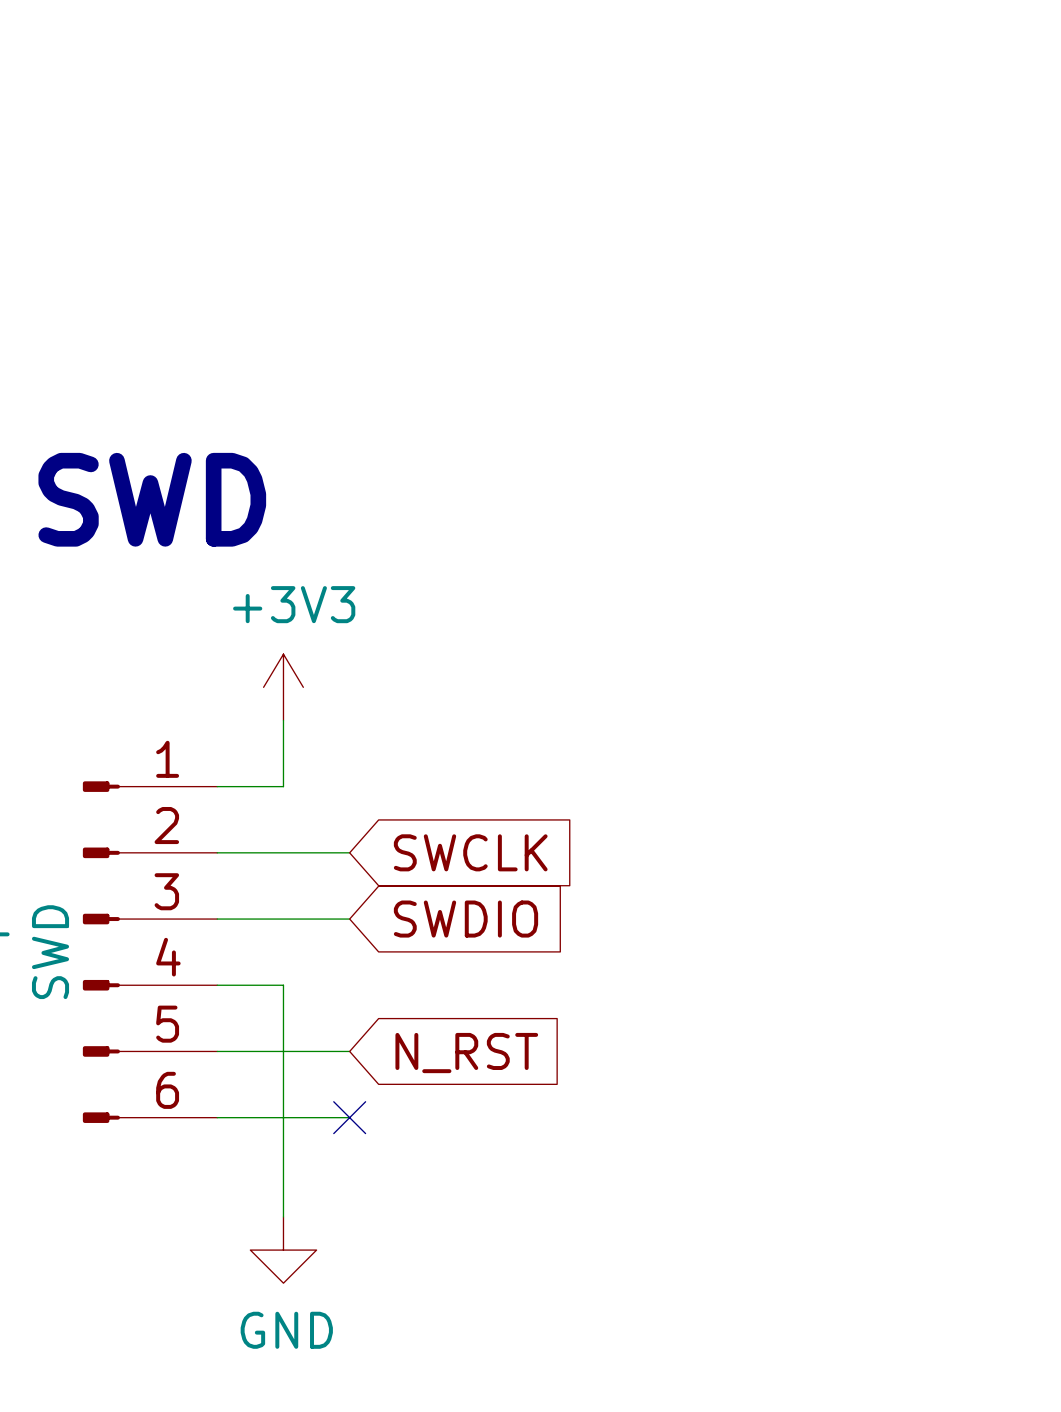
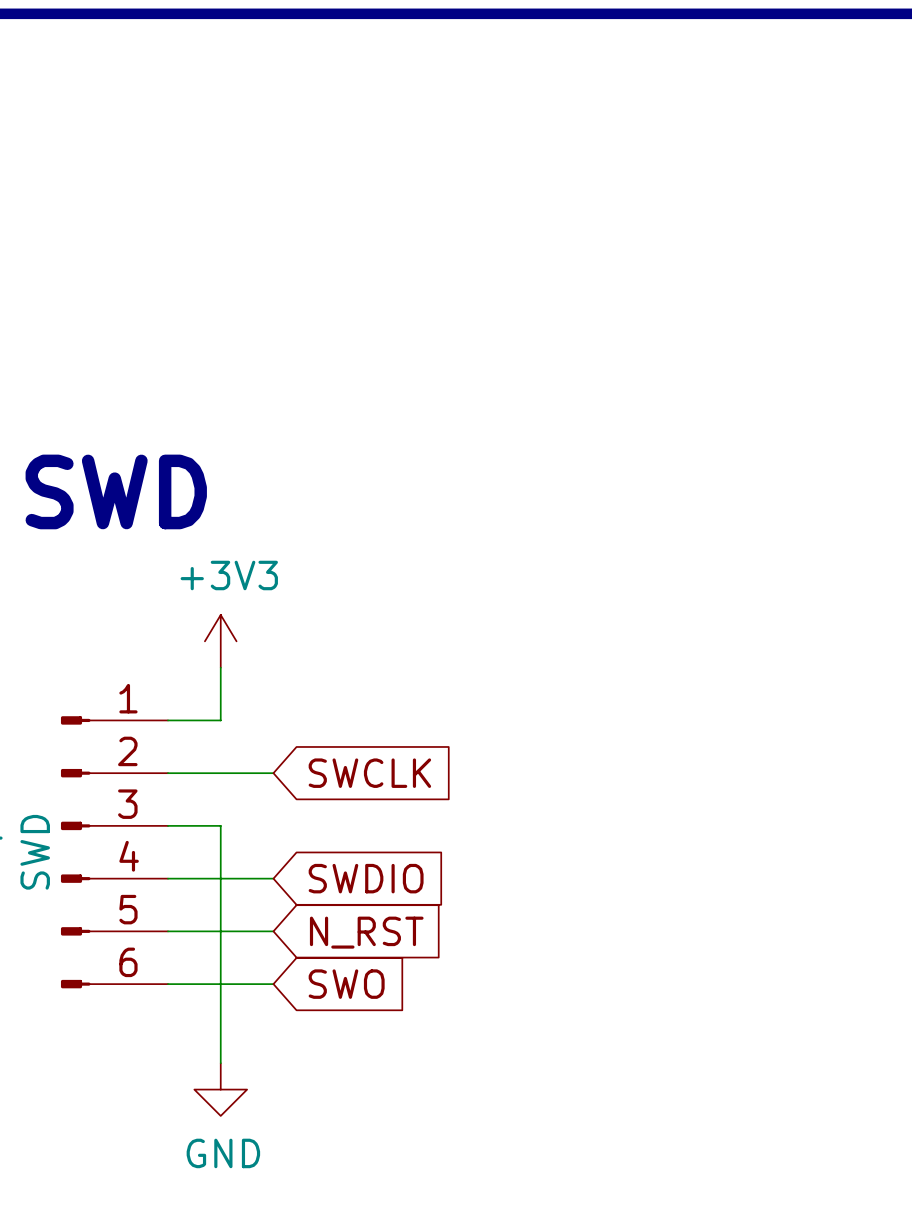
wire: (283, 919) (349, 919) -> (220, 825) (220, 878) (273, 878)
global label position: SWDIO (465, 919) -> SWDIO (366, 878)
no-connect mark: (349, 1117) -> none
global label: none -> SWO (346, 984)

